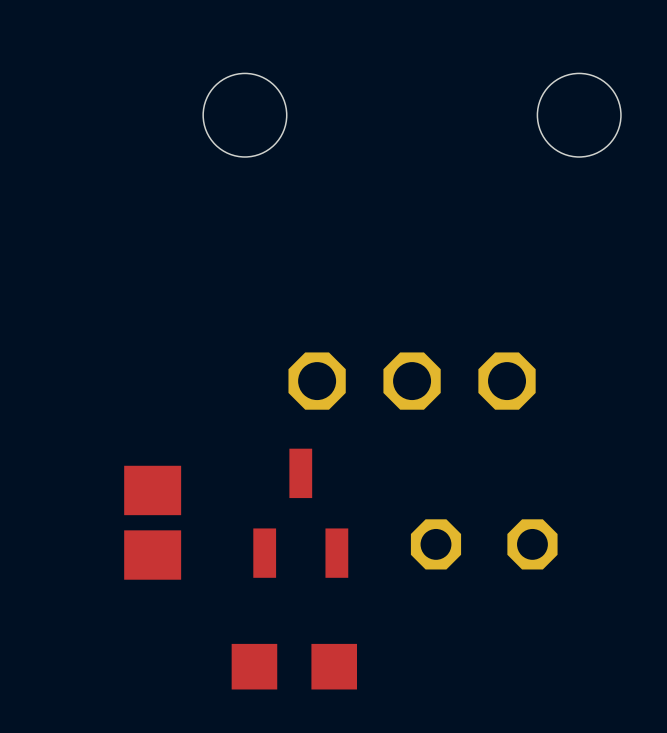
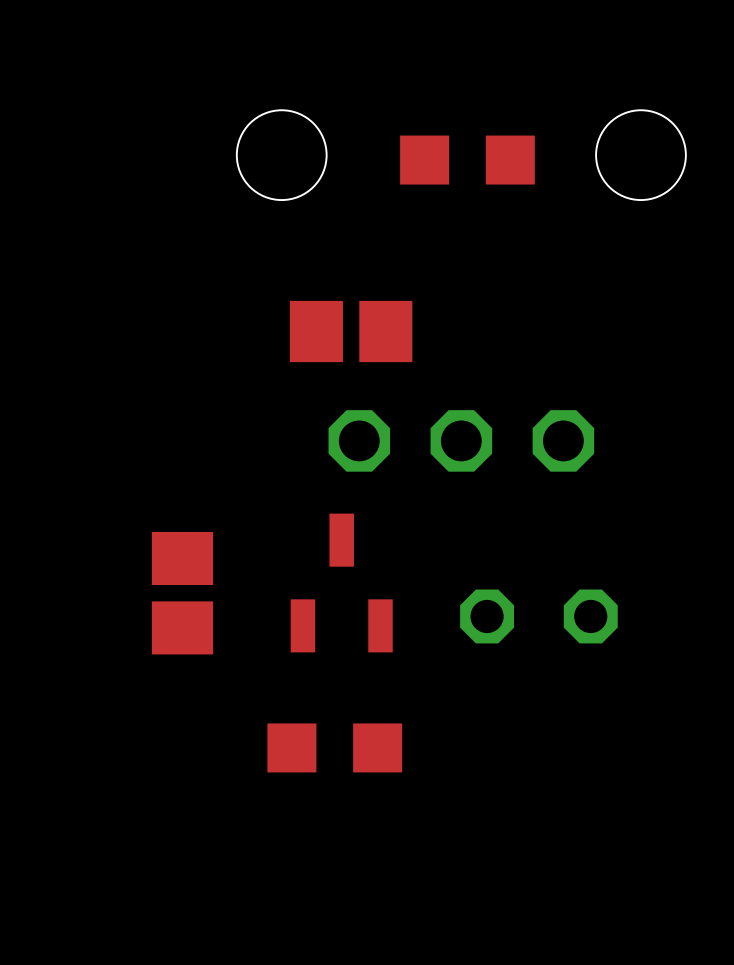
part: none -> (467, 160)
part: none -> (351, 331)

